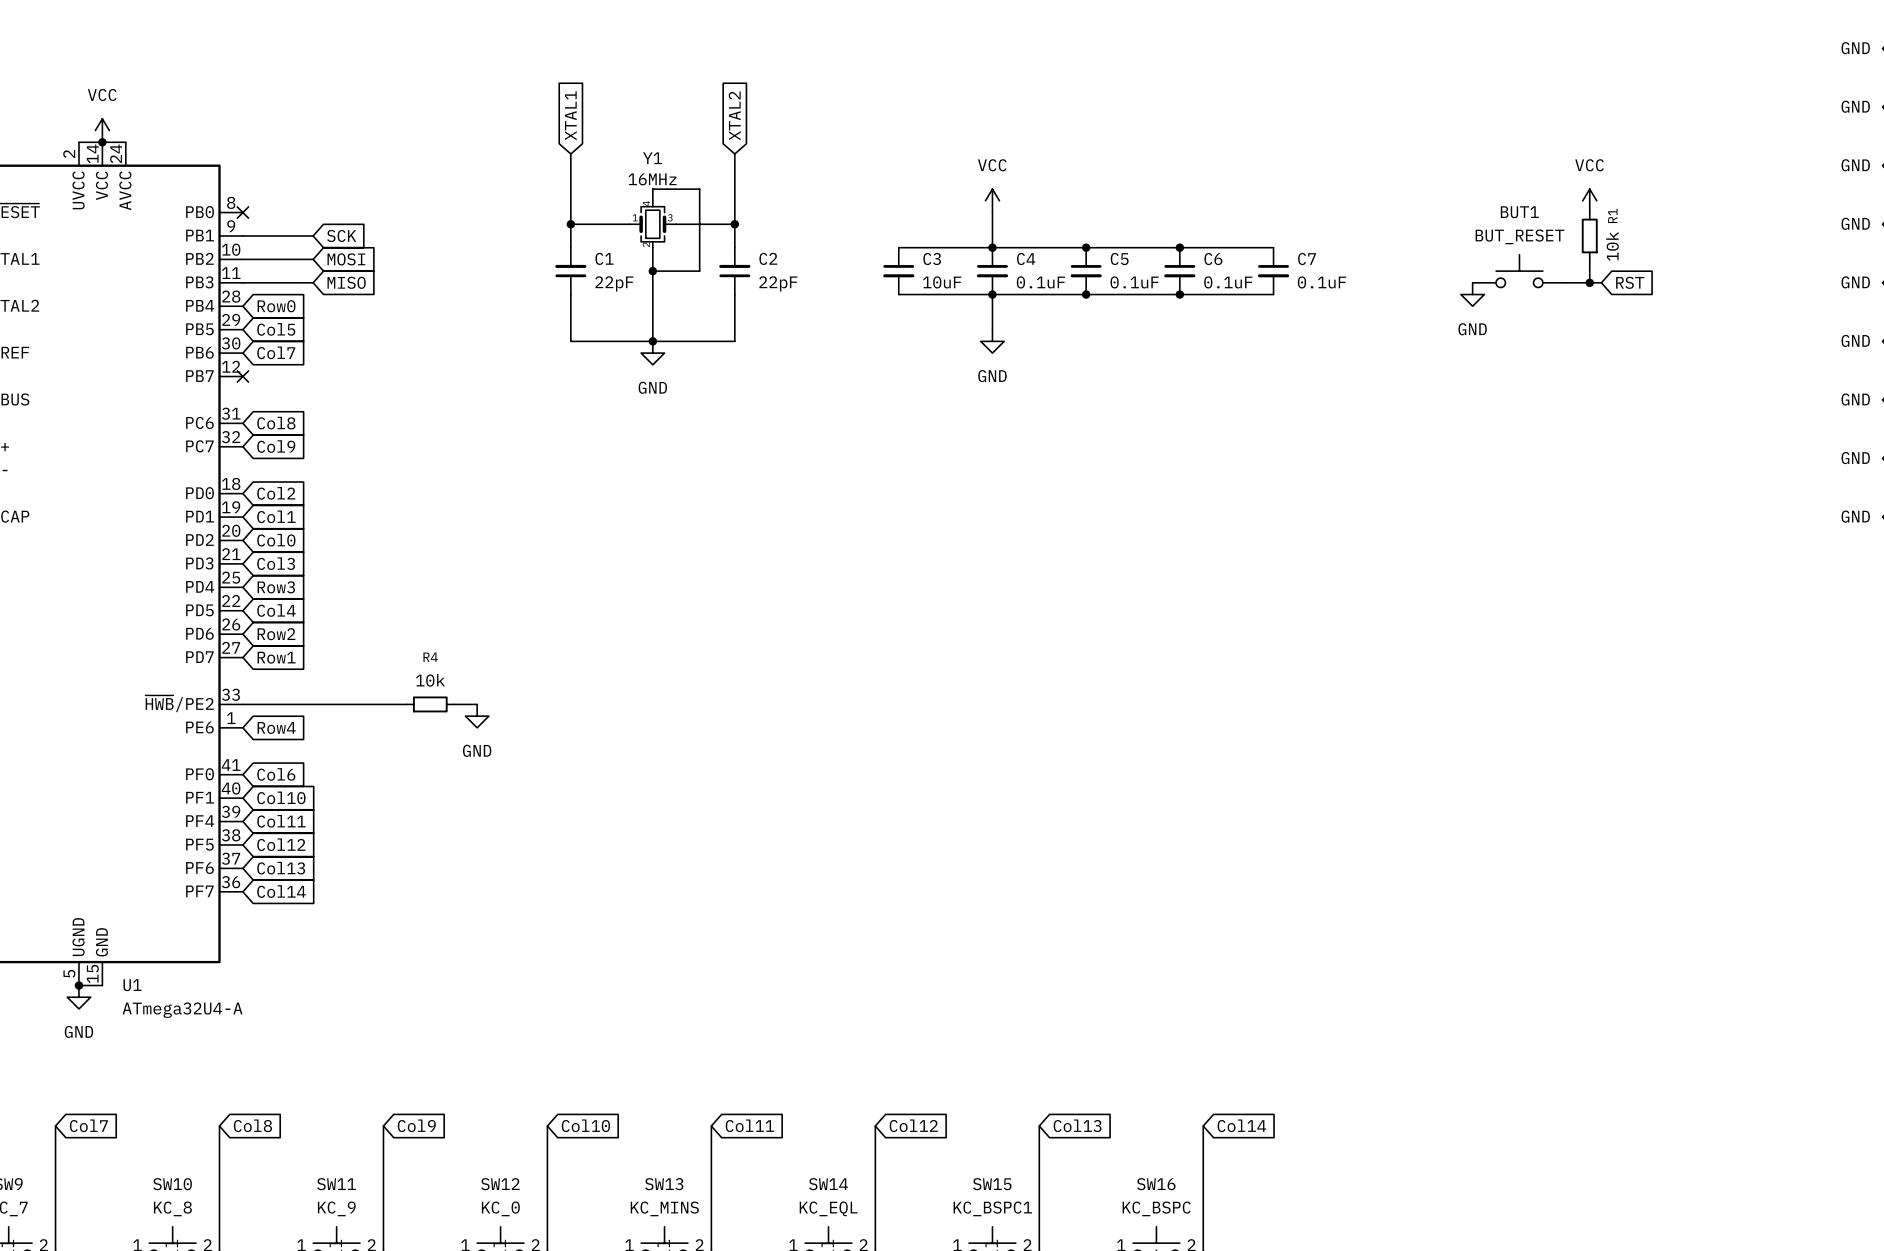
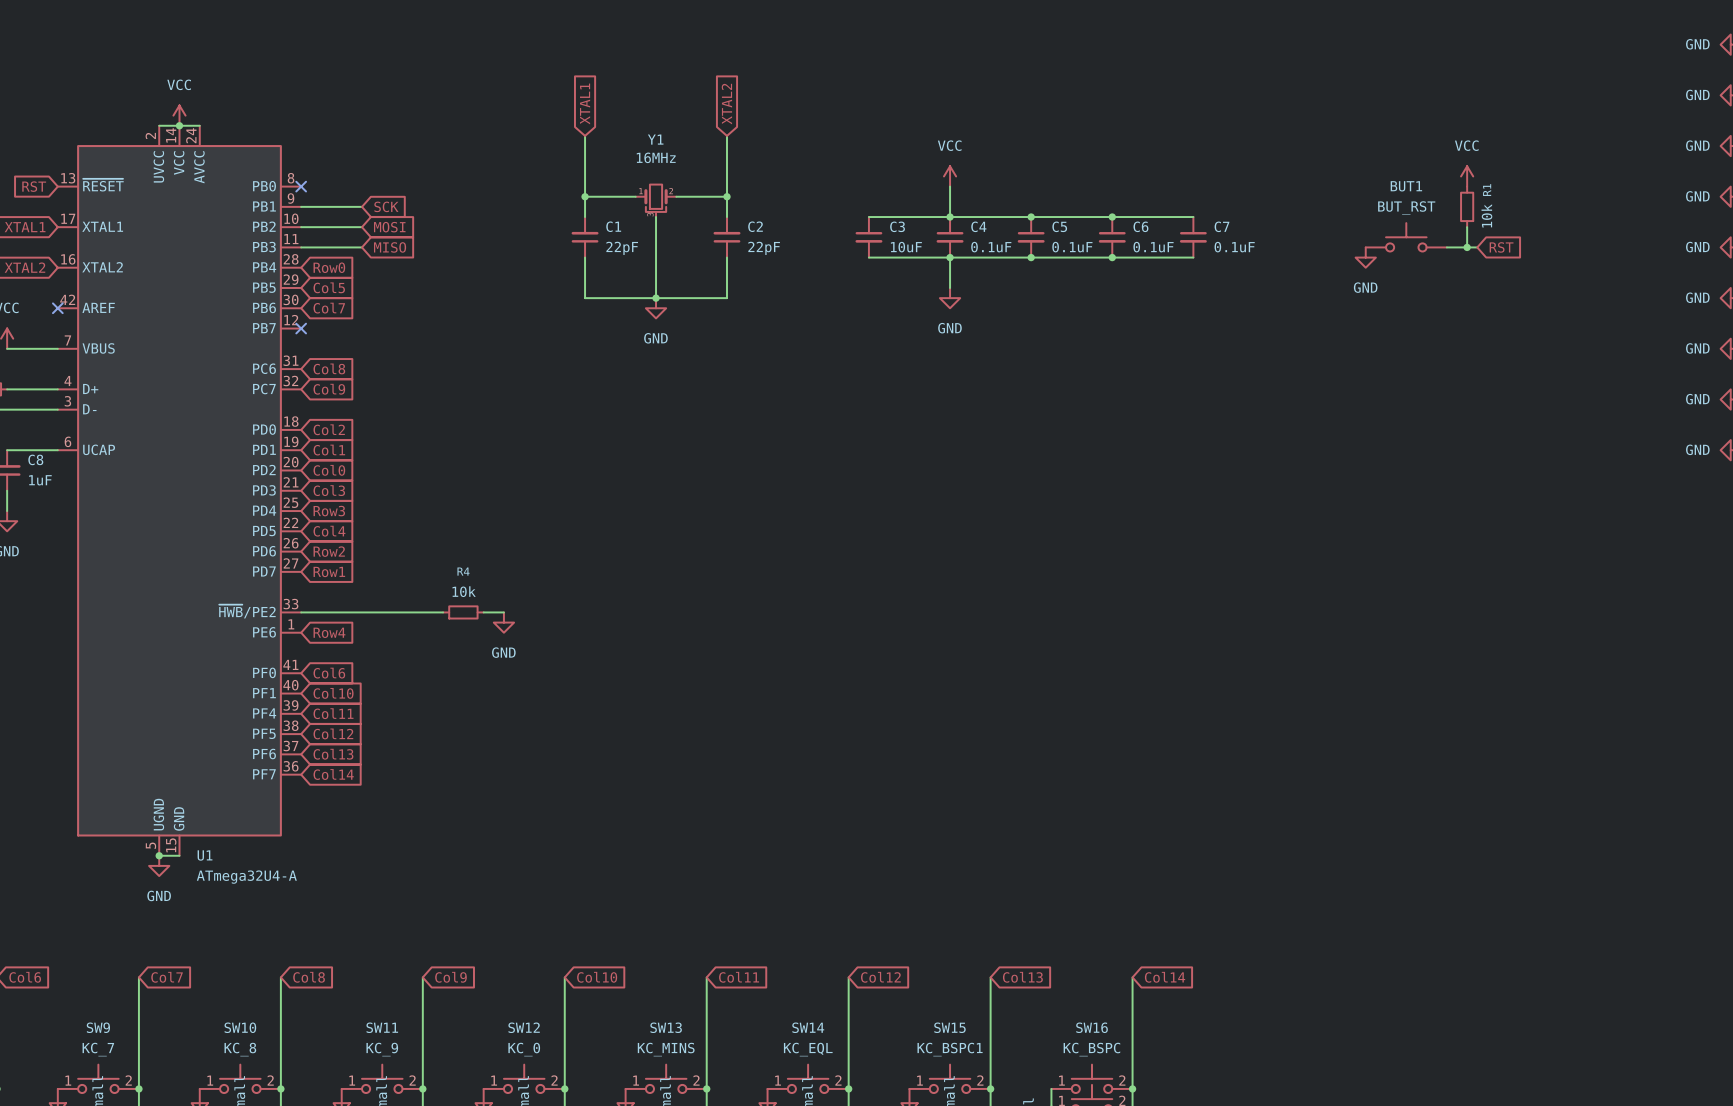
Y1 symbol: [629, 200, 677, 248] -> [635, 184, 677, 218]
wire: (652, 200) (652, 189) (699, 189) (699, 271) (652, 271) -> none
BUT1 value: BUT_RESET (1520, 236) -> BUT_RST (1406, 208)
junction: (652, 271) -> none

